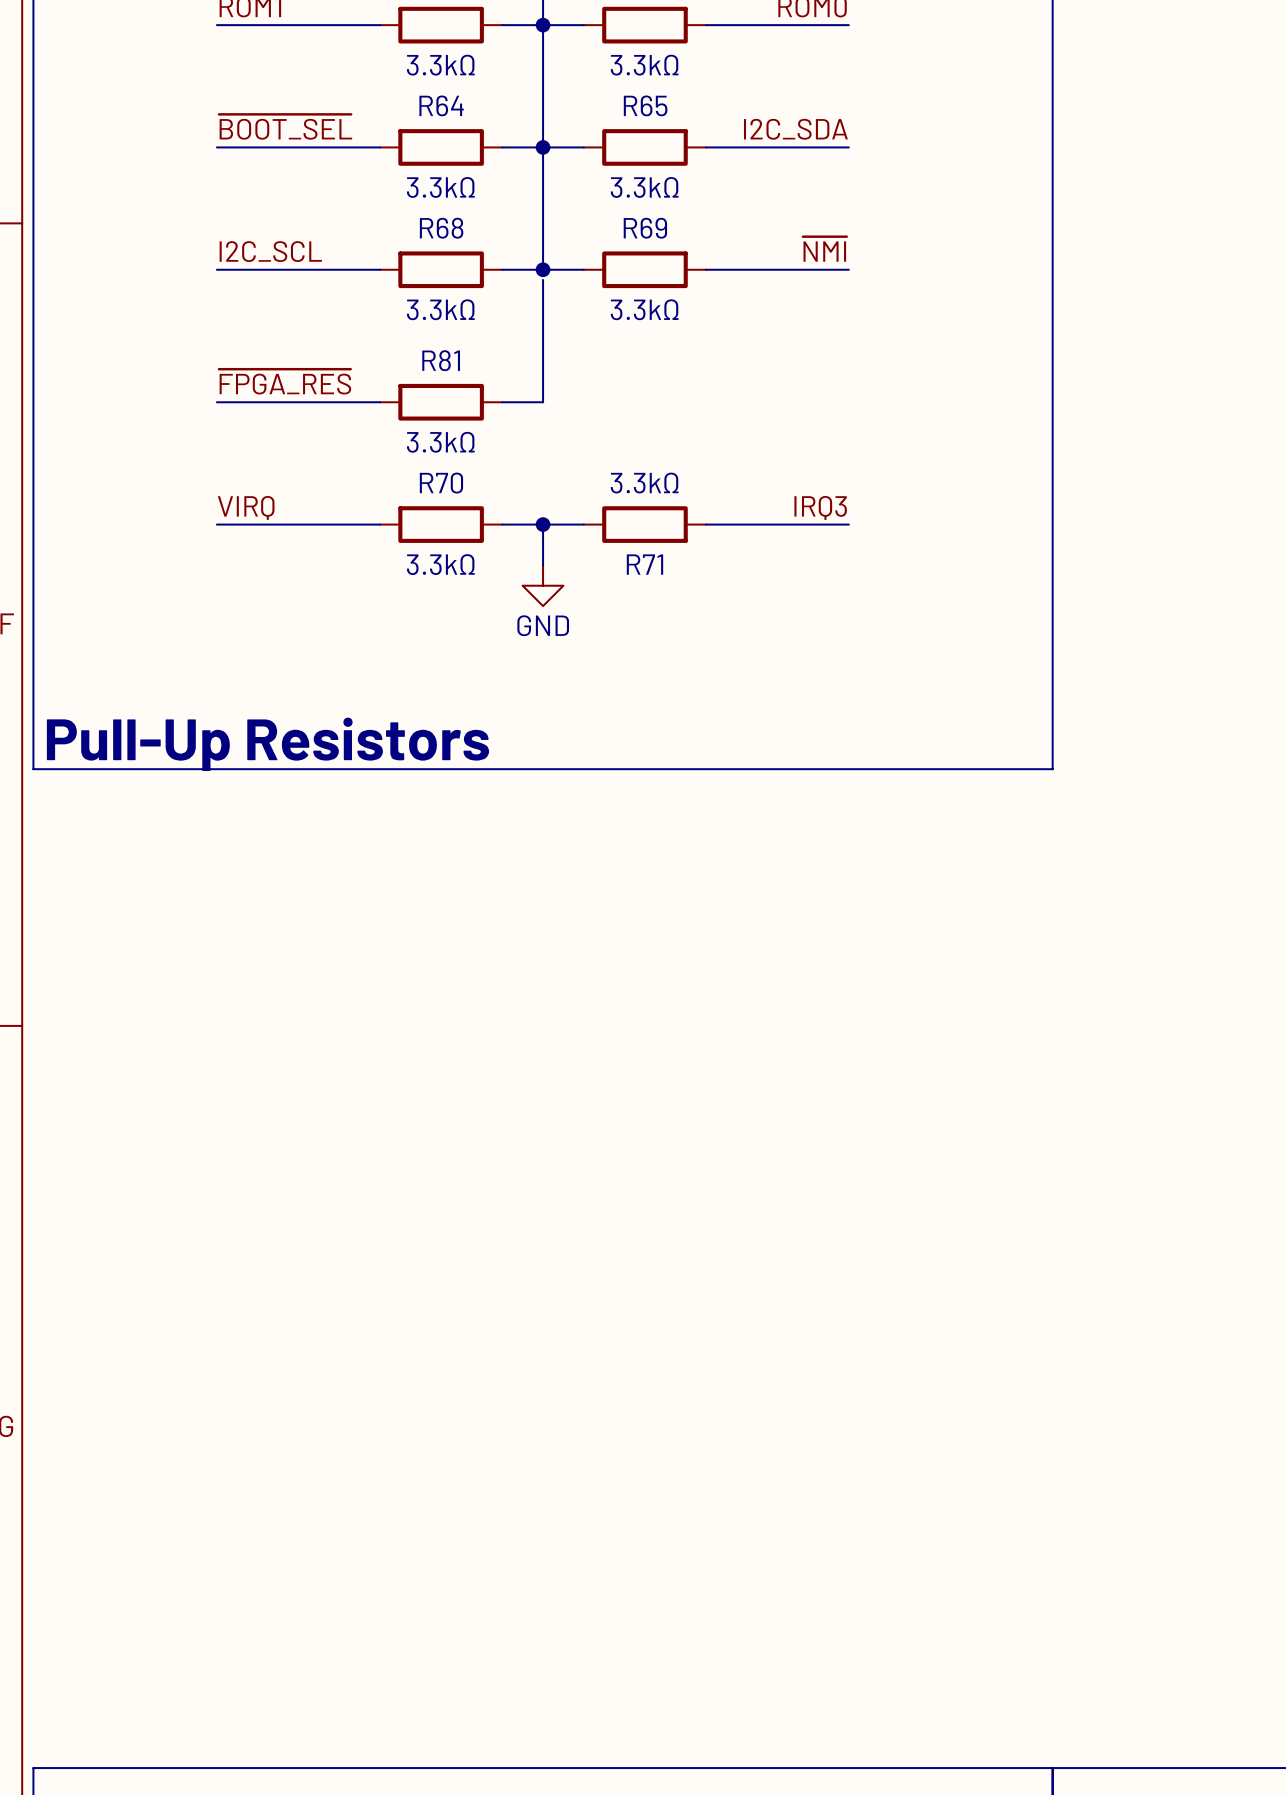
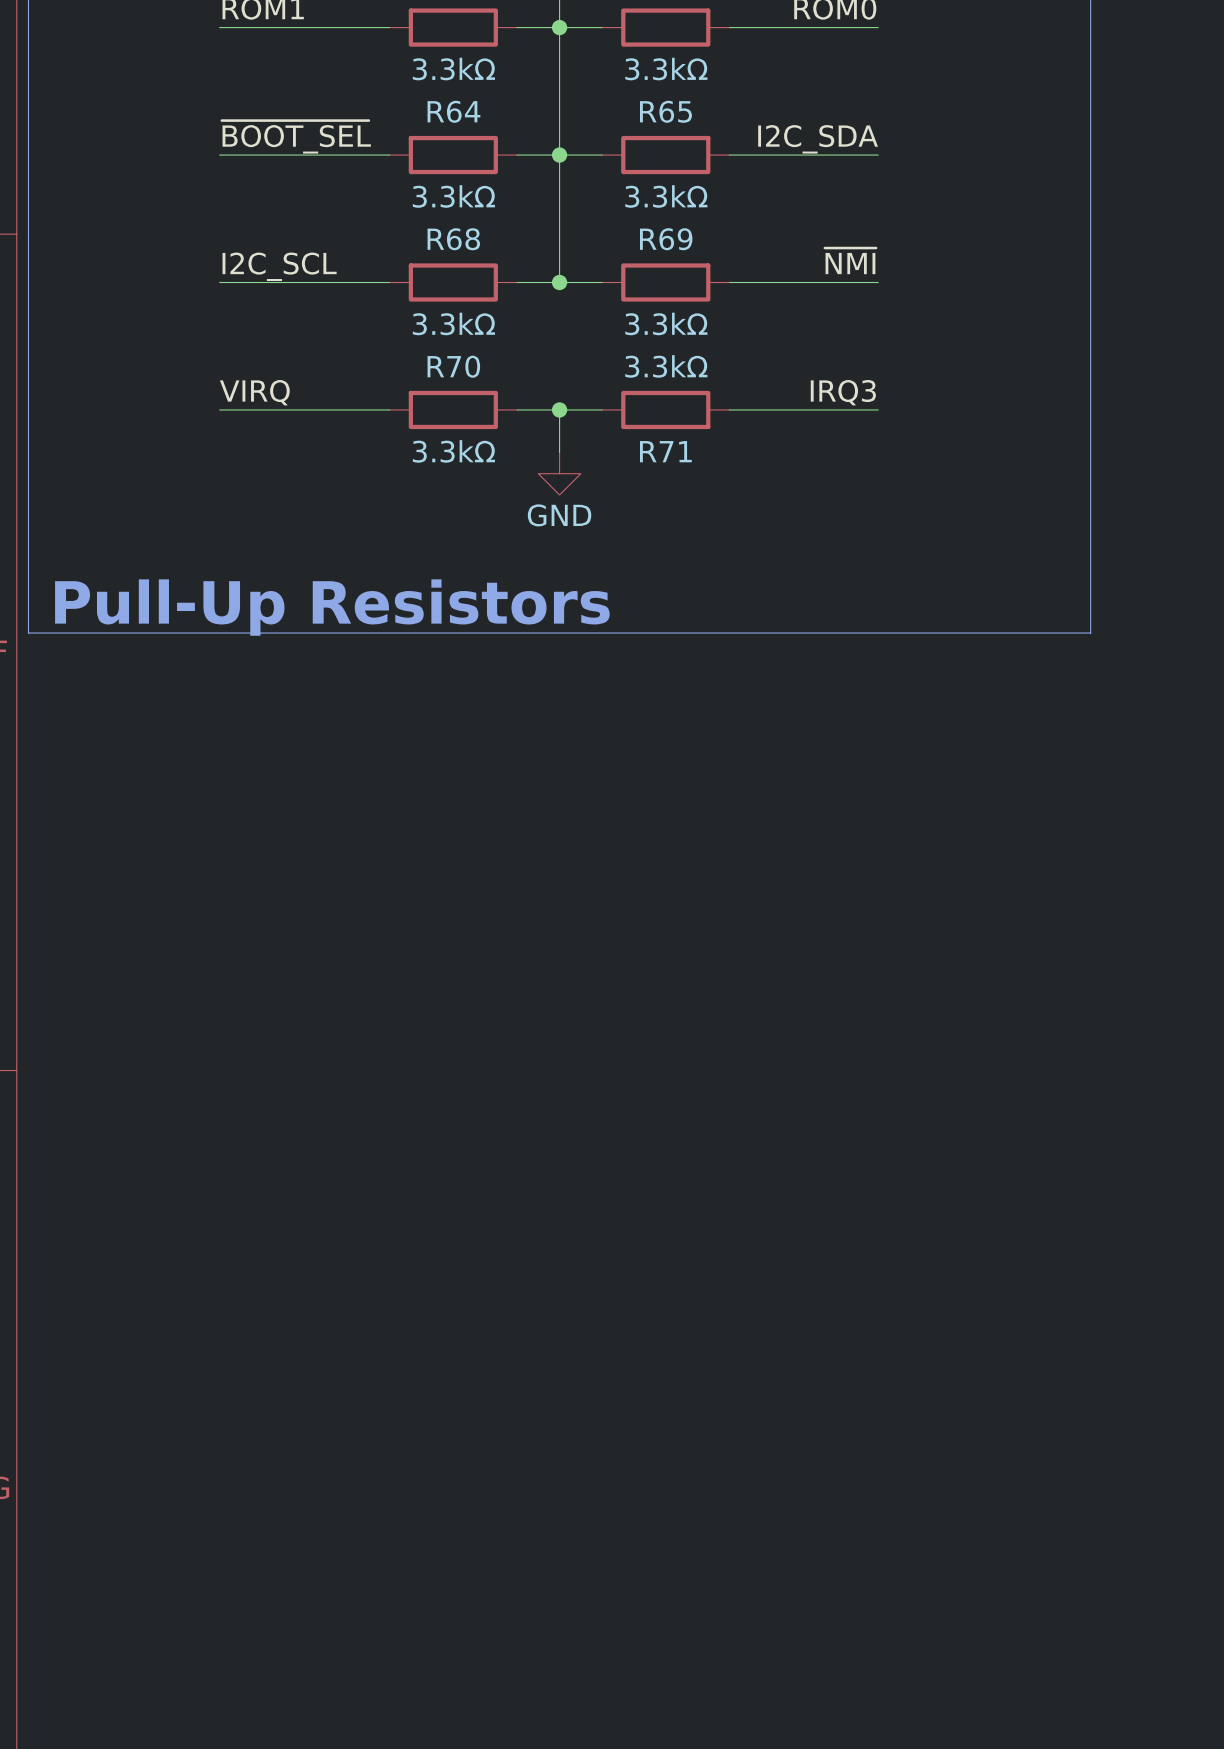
wire: (543, 279) (543, 392) -> none
label: ~{FPGA_RES} (285, 381) -> none
junction: none -> (559, 409)
wire: (216, 402) (379, 402) -> none
R81: 3.3kΩ (441, 402) -> none
wire: (502, 402) (543, 402) -> (559, 452) (559, 420)
label position: VIRQ (246, 507) -> VIRQ (254, 392)
label position: IRQ3 (820, 507) -> IRQ3 (843, 392)
wire: (216, 524) (379, 524) -> (219, 409) (389, 409)
R70 position: (441, 524) -> (453, 409)
wire: (502, 524) (583, 524) -> (517, 409) (602, 409)
wire: (543, 524) (543, 565) -> none
junction: (543, 524) -> none
R71 position: (644, 524) -> (665, 409)
wire: (706, 524) (848, 524) -> (729, 409) (878, 409)
power symbol position: GND (543, 585) -> GND (559, 473)
line: (33, 606) (33, 769) (1052, 769) (1052, 606) -> (28, 633) (1090, 633)
text position: Pull-Up Resistors (267, 744) -> Pull-Up Resistors (332, 607)

